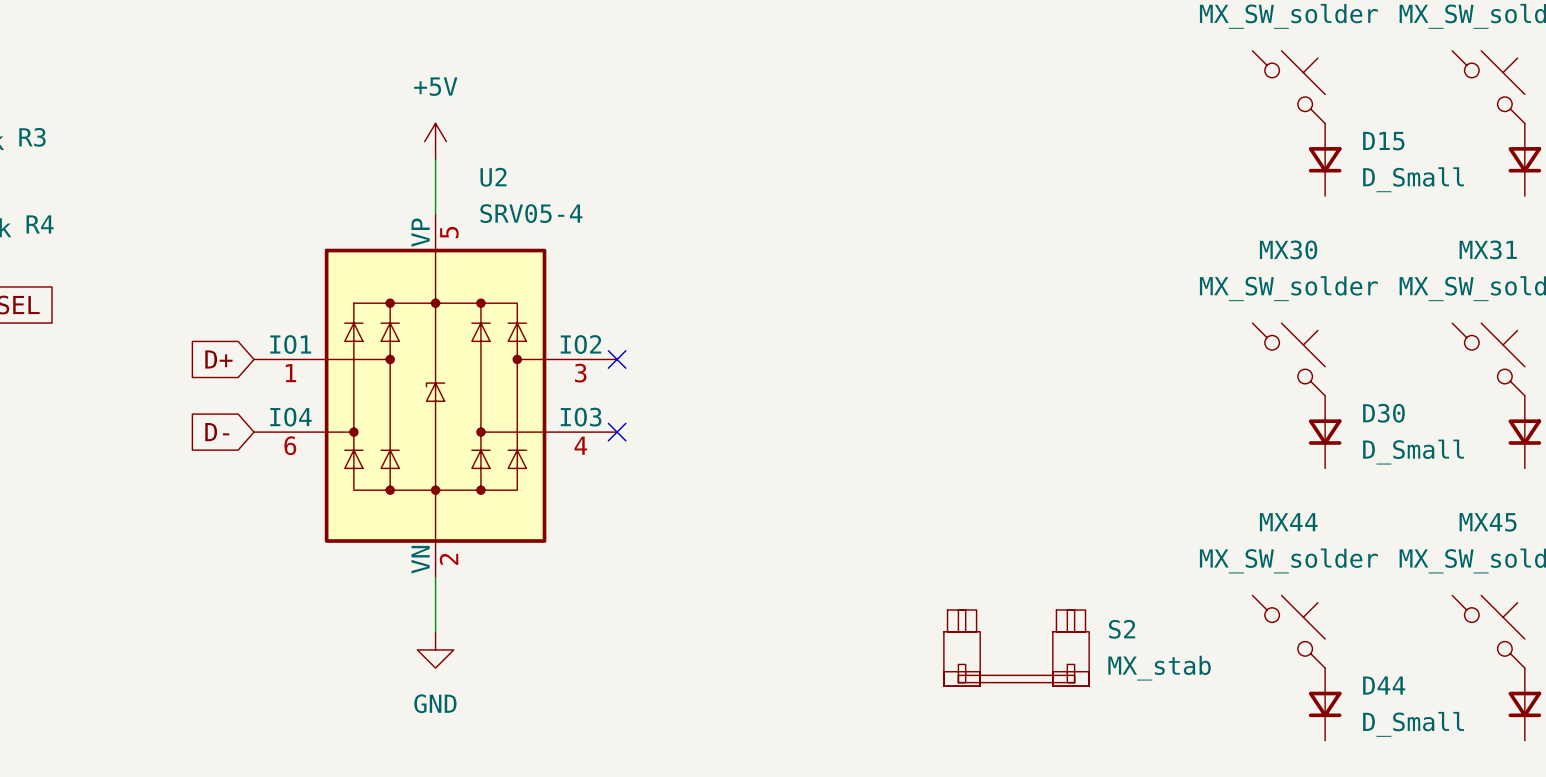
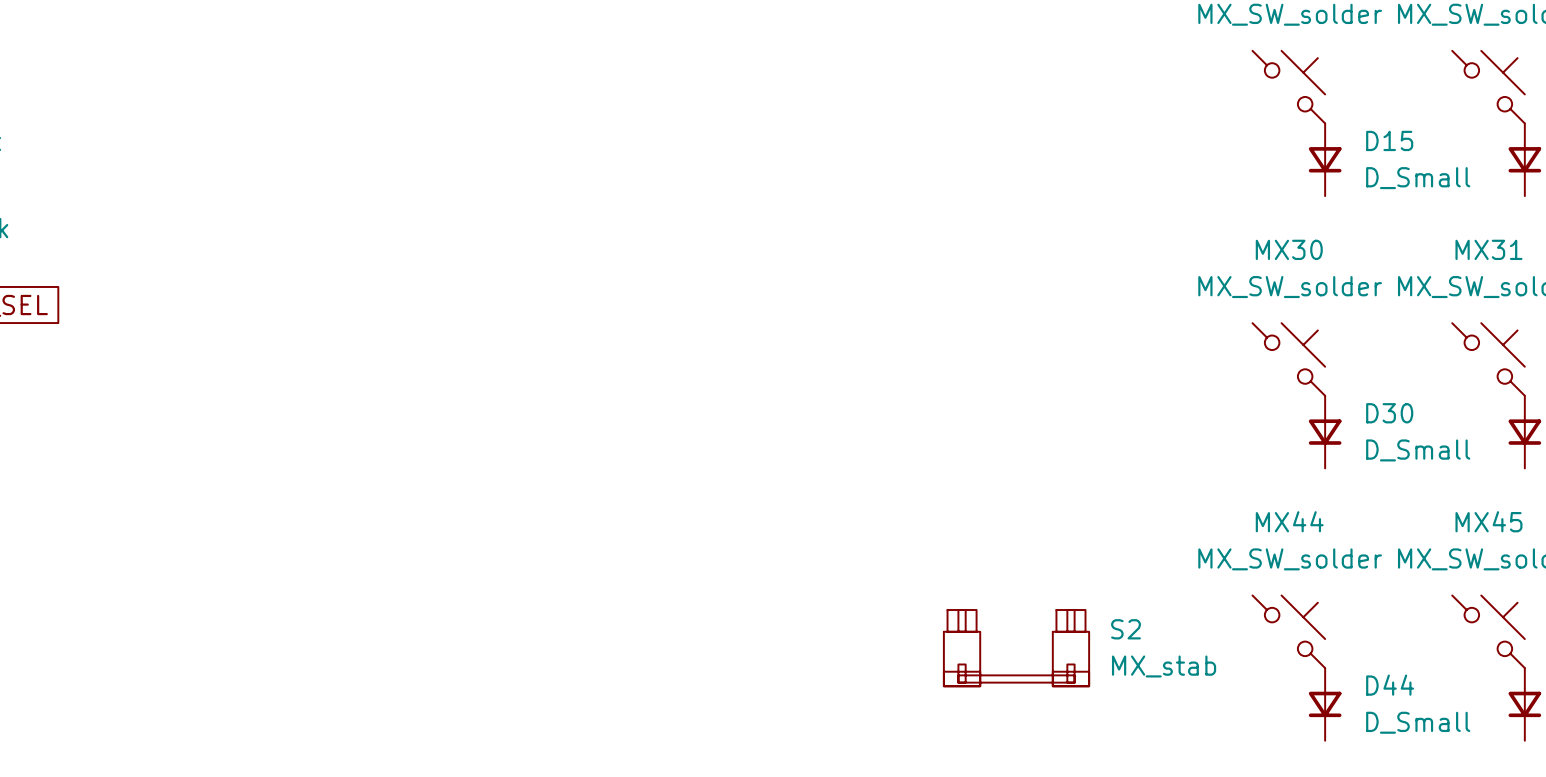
R3 name: R3 (32, 137) -> none
power symbol: +5V (435, 141) -> none
wire: (435, 159) (435, 214) -> none
R4 name: R4 (40, 224) -> none
global label: D+ (218, 359) -> none
no-connect mark: (617, 359) -> none
U2: SRV05-4 (435, 395) -> none
global label: D- (217, 432) -> none
no-connect mark: (617, 432) -> none
wire: (435, 577) (435, 631) -> none
power symbol: GND (435, 649) -> none

